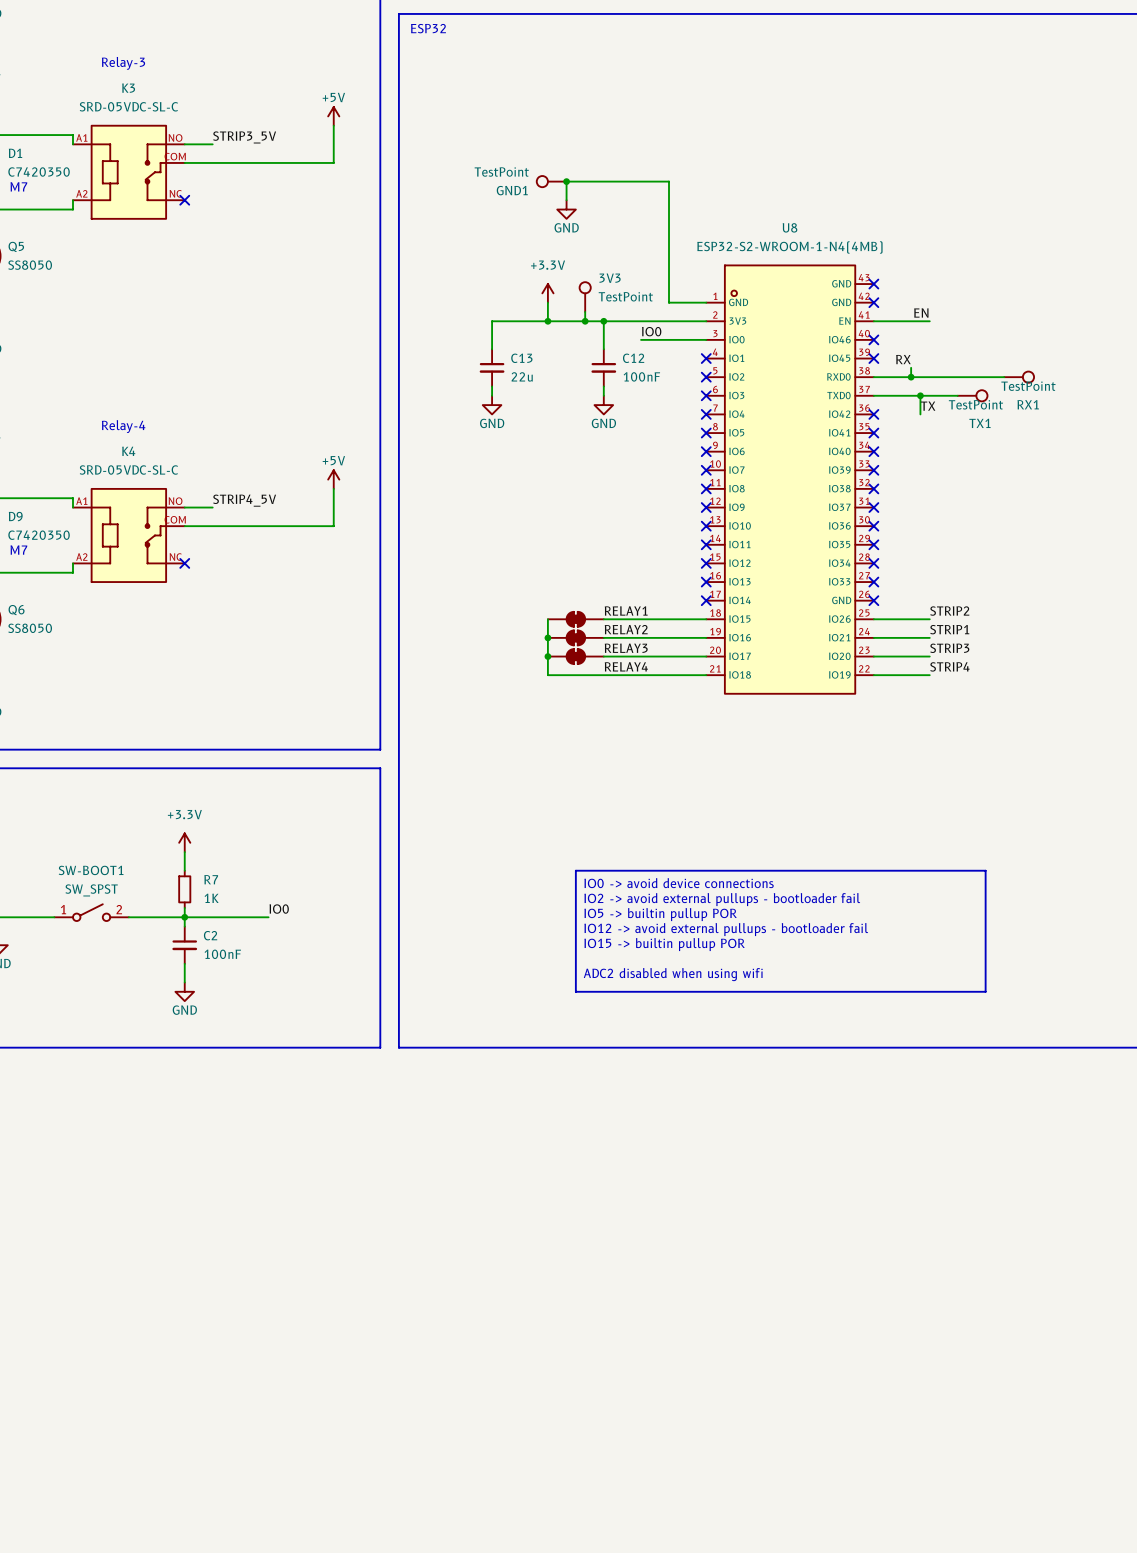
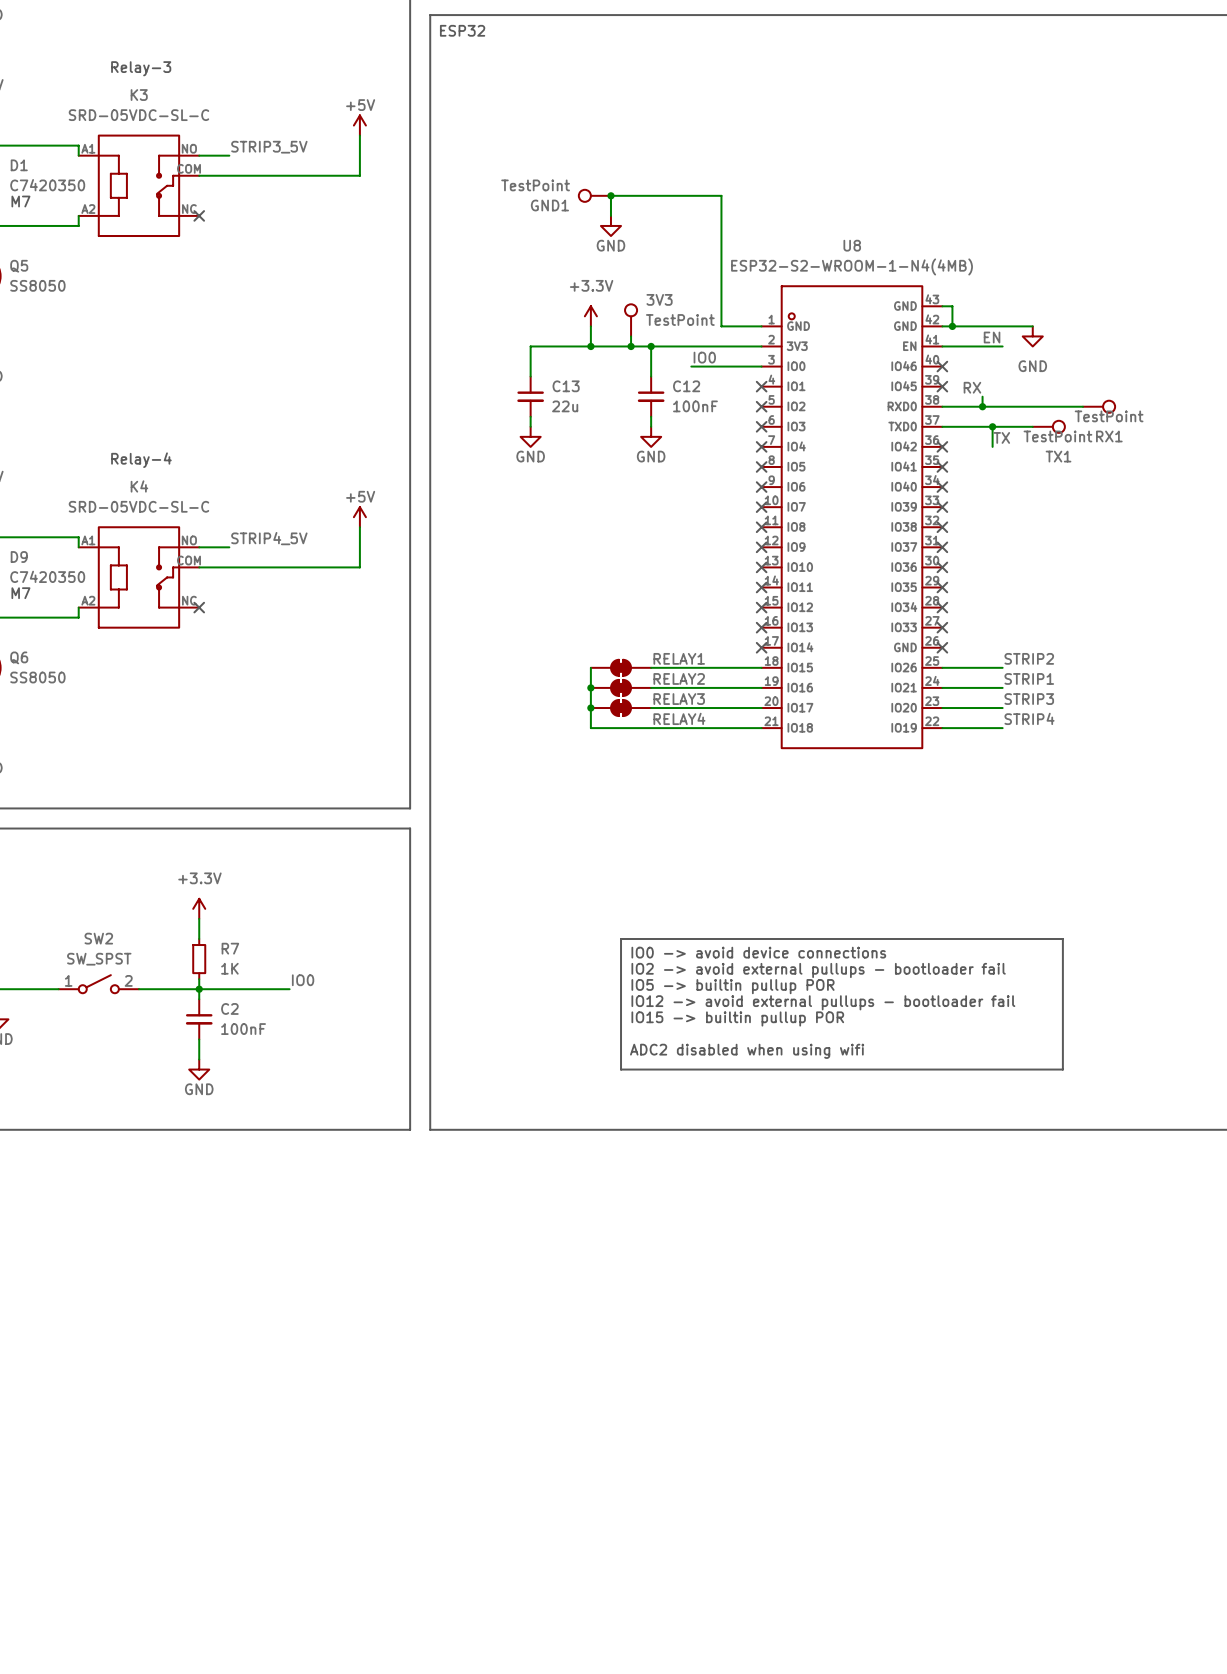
wire: none -> (942, 306) (952, 306) (952, 326)
no-connect mark: (873, 284) -> none
wire: none -> (942, 326) (1032, 326)
no-connect mark: (873, 302) -> none
junction: none -> (952, 326)
power symbol: none -> GND (1032, 336)
SW-BOOT1 name: SW-BOOT1 (91, 870) -> SW2 (98, 938)

